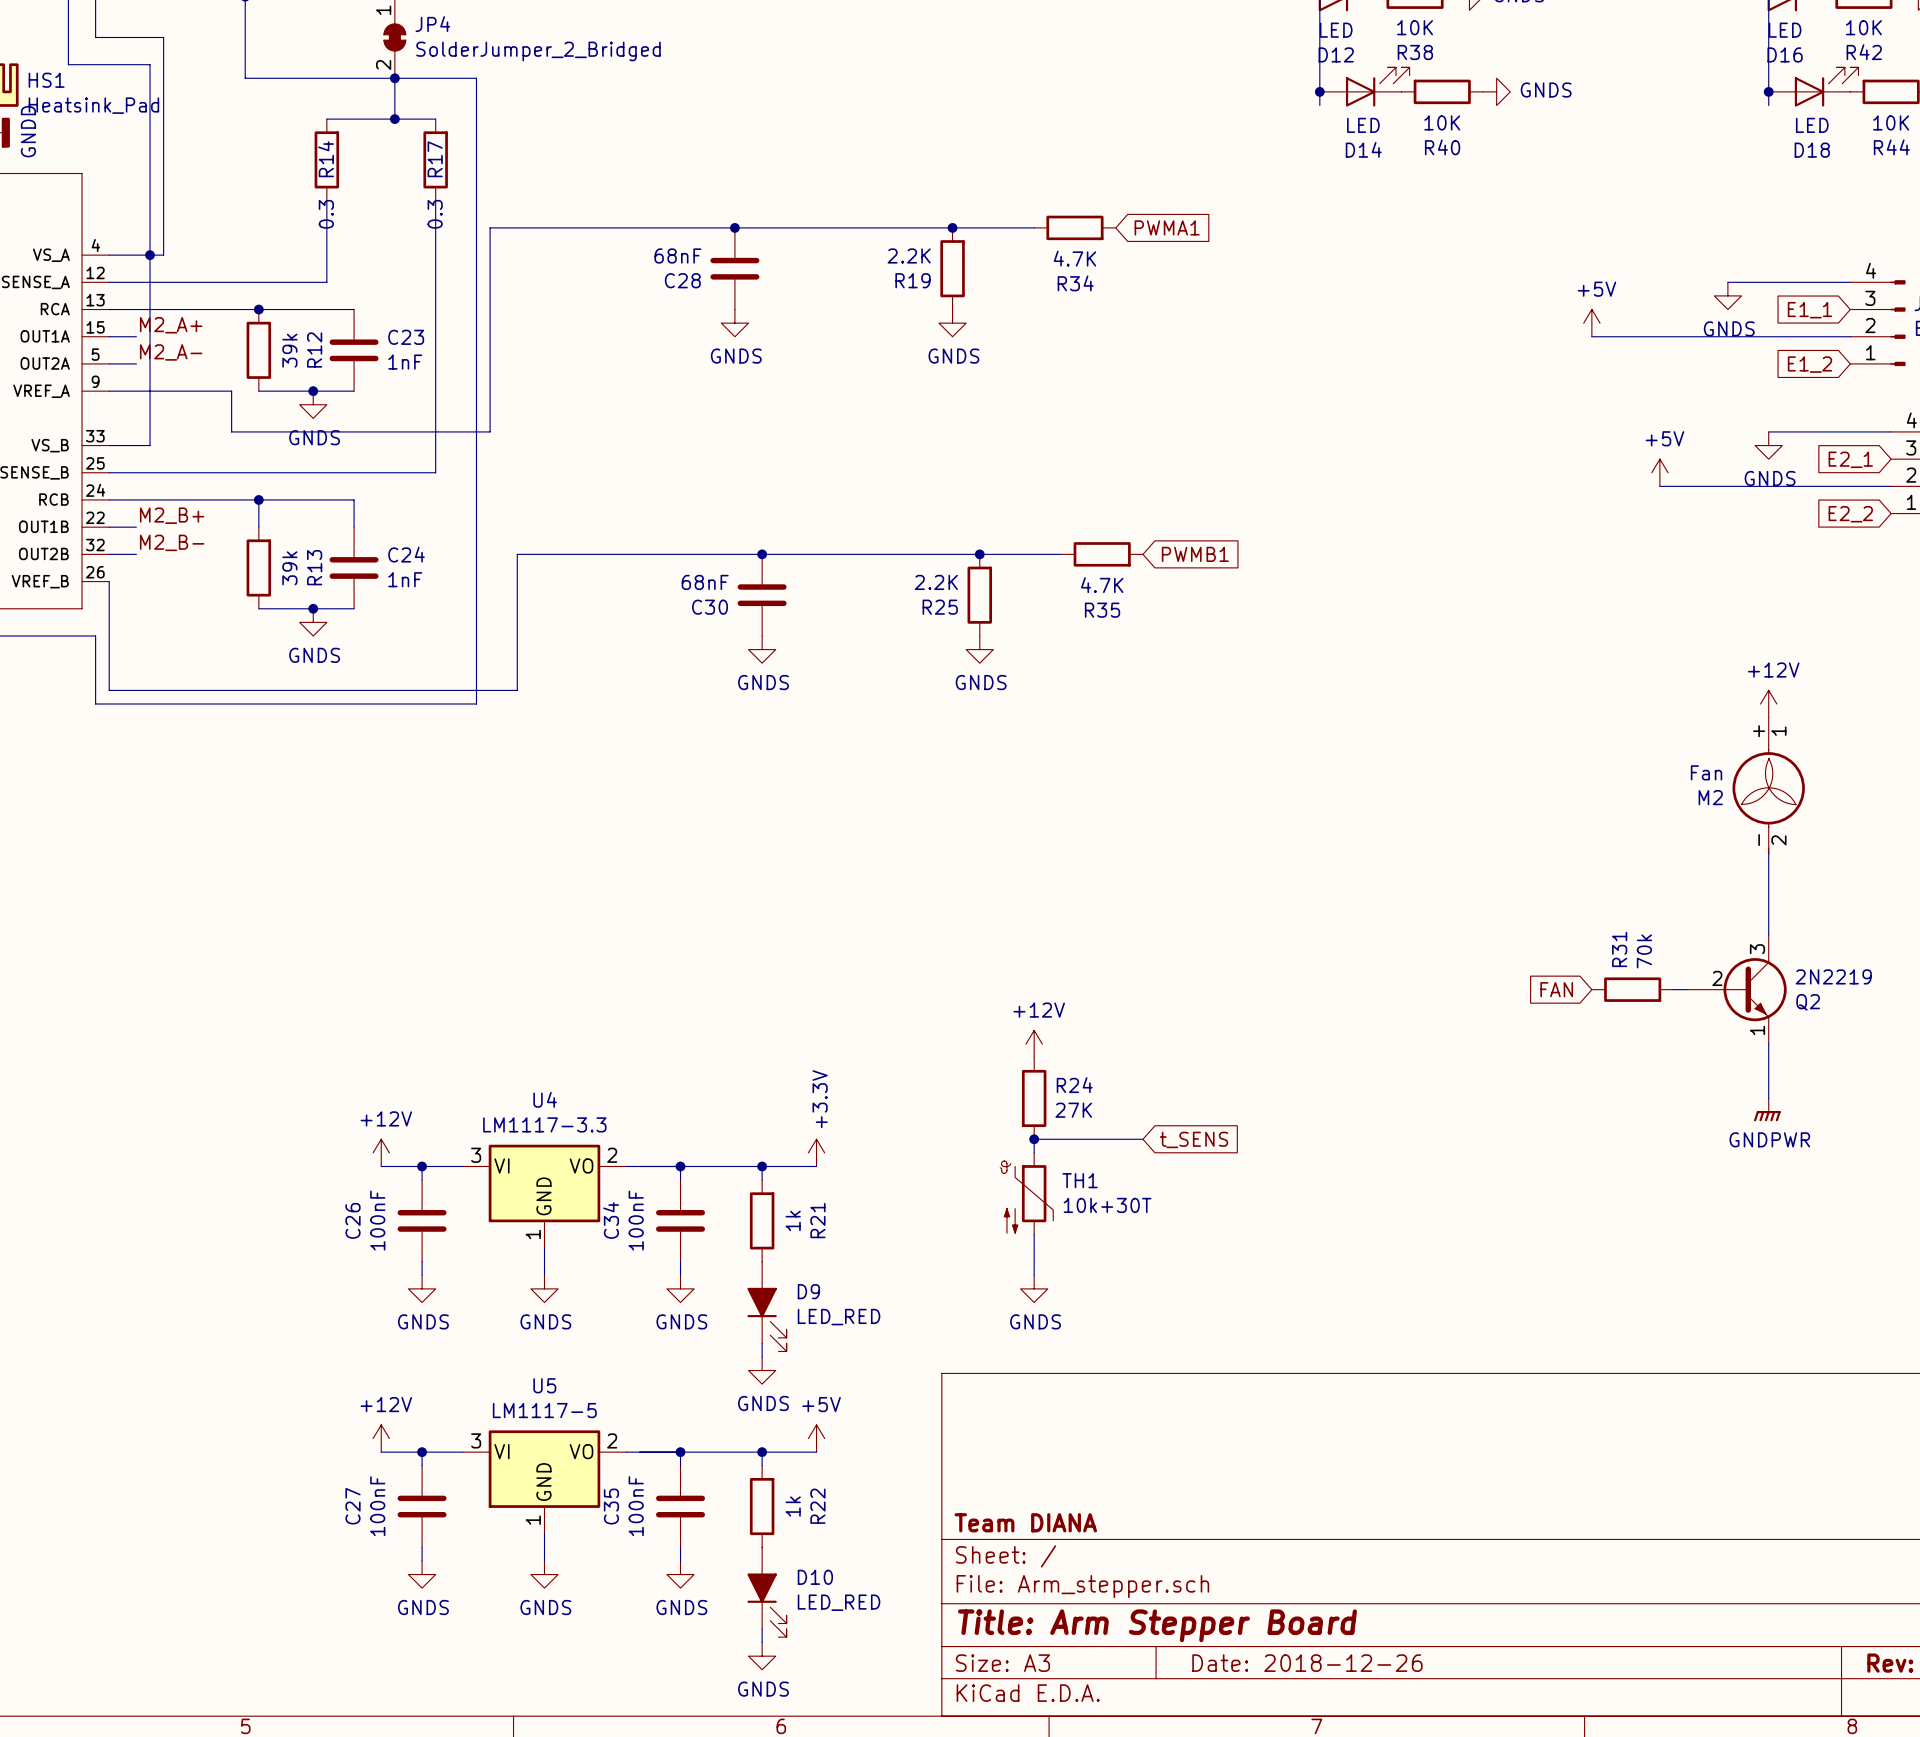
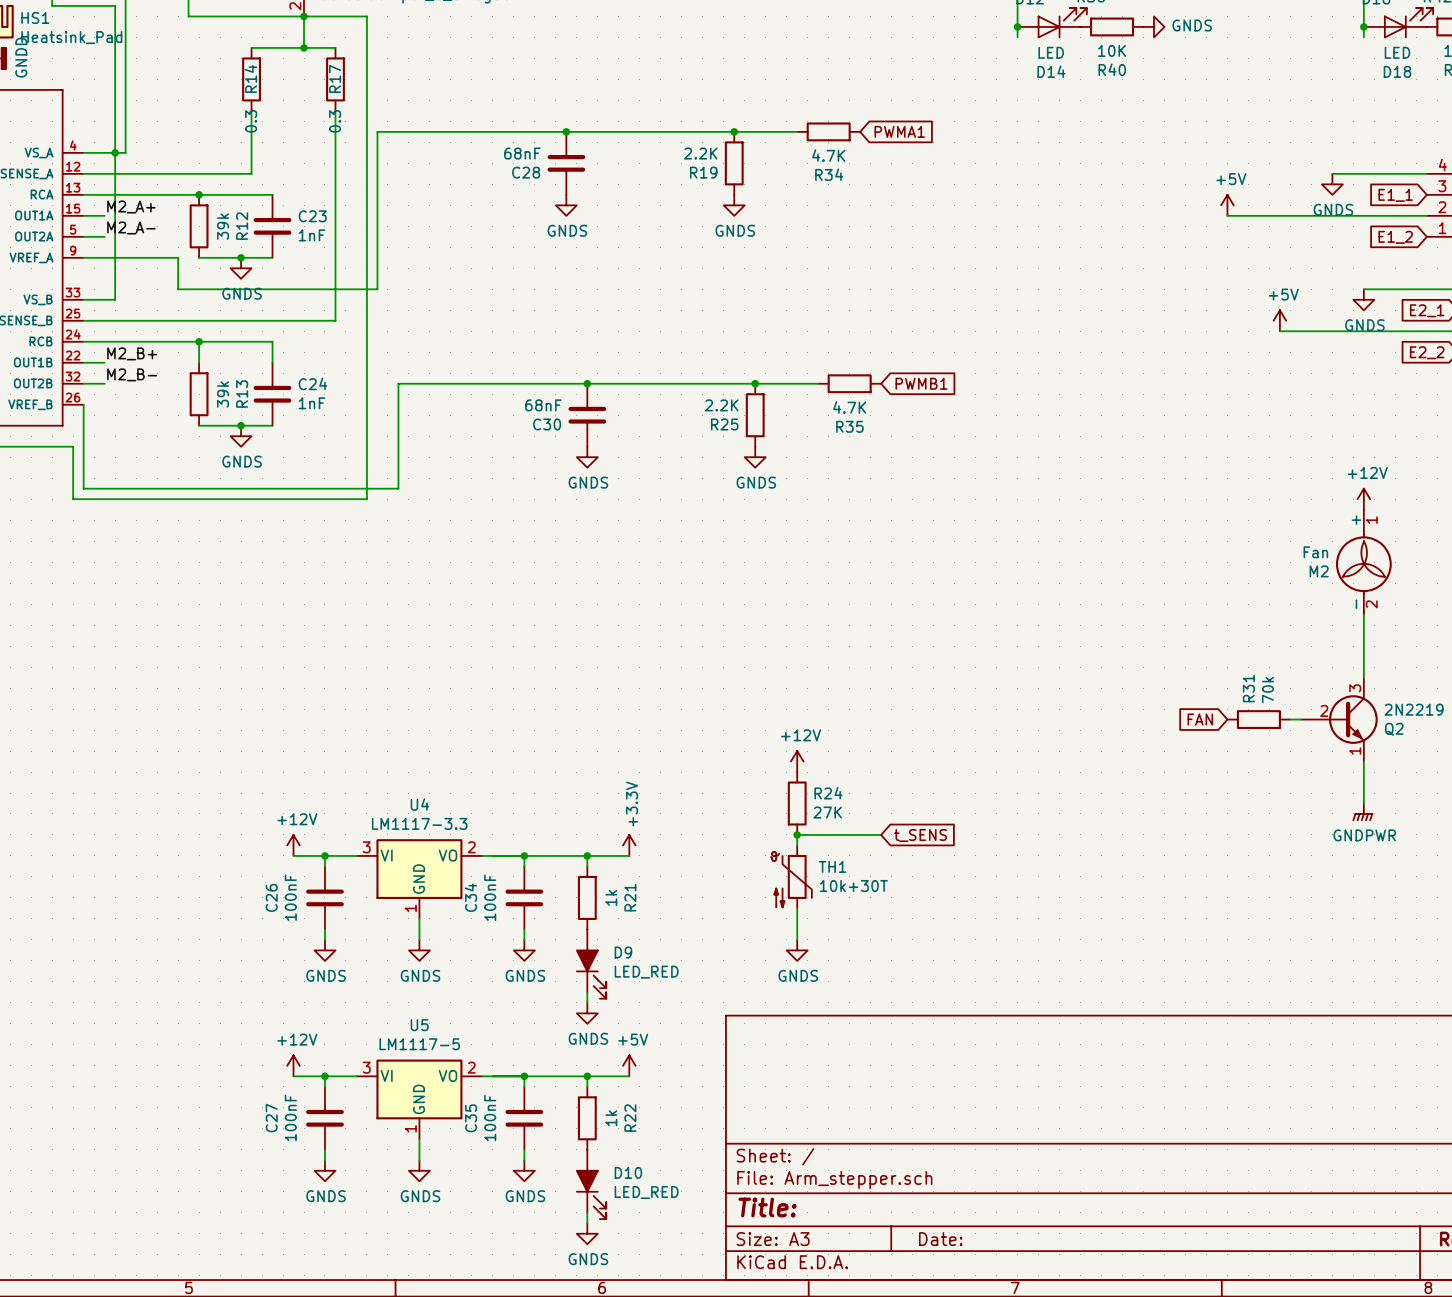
title block: Team DIANA (1025, 1522) -> none
title block: Title: Arm Stepper Board (1157, 1625) -> Title: (767, 1207)
title block: Date: 2018-12-26 (1307, 1663) -> Date: (940, 1239)

